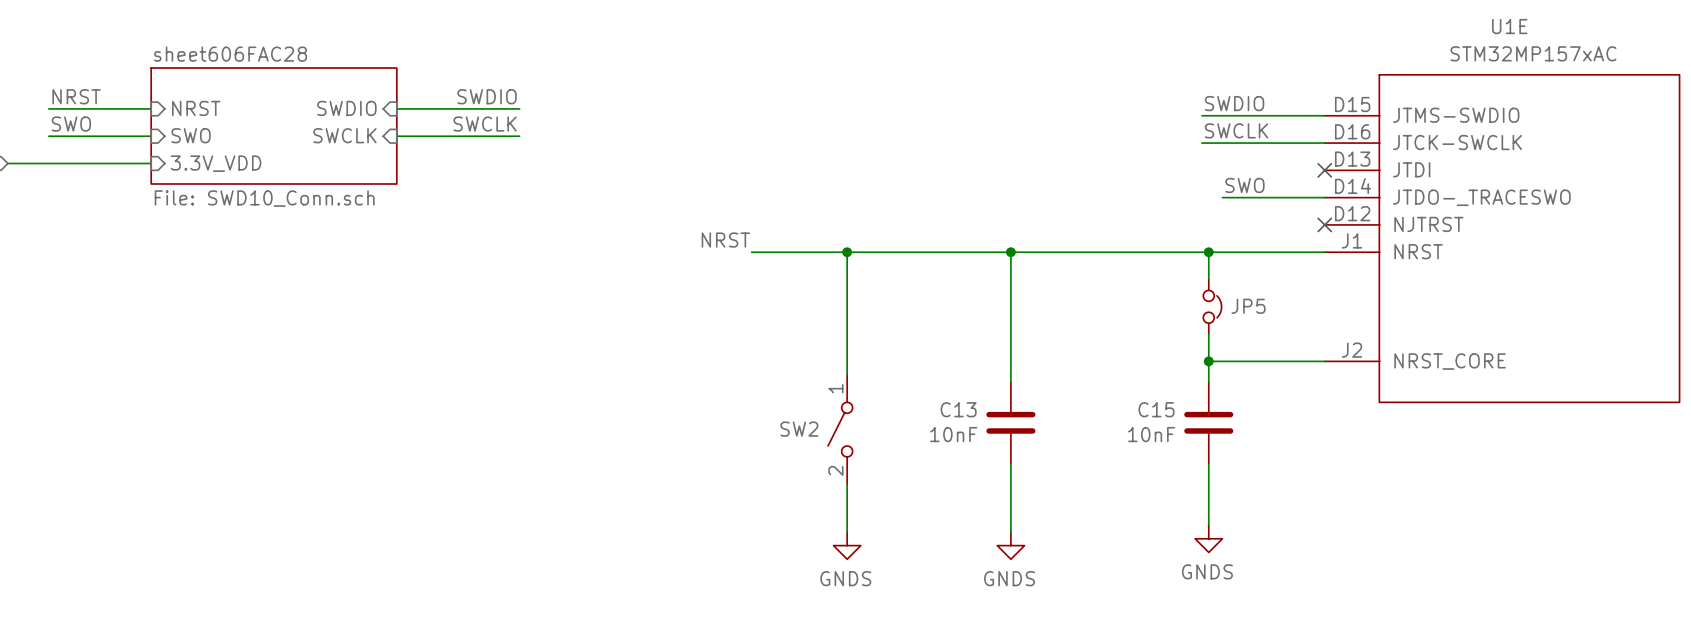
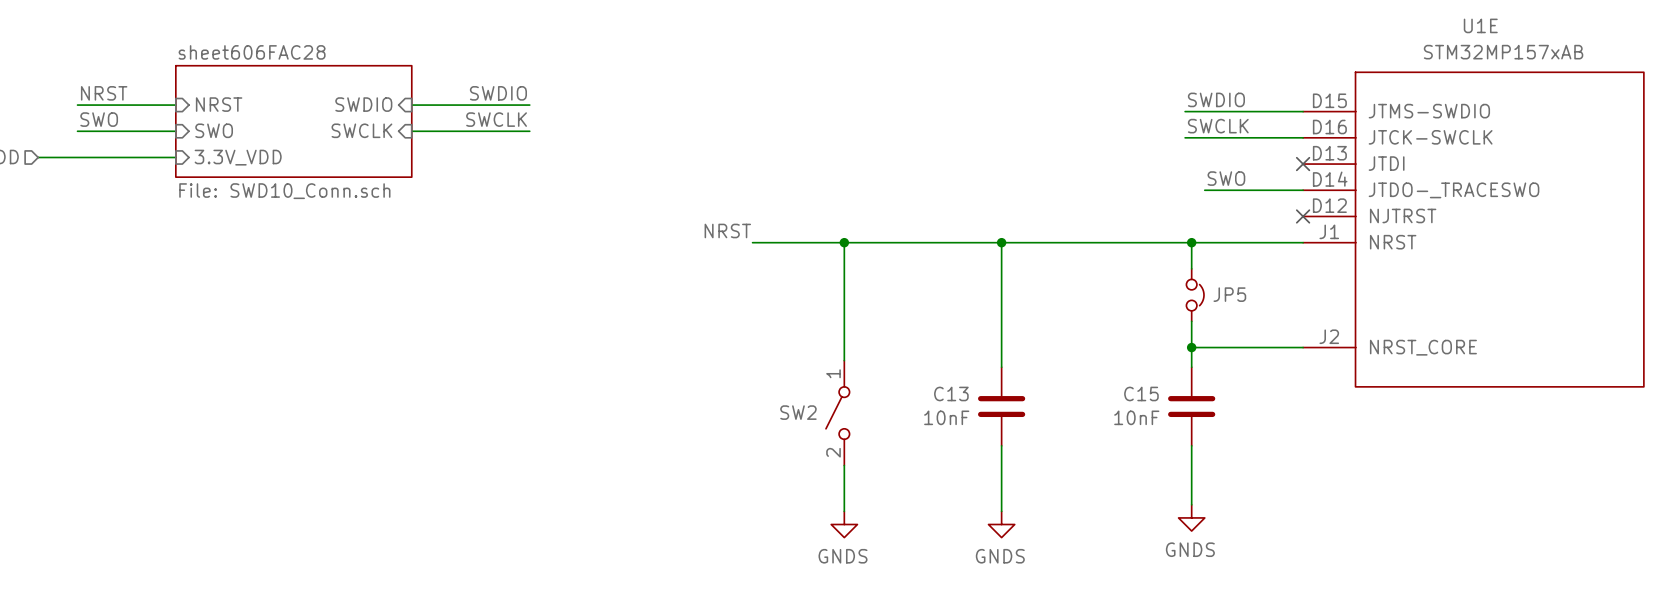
U1E value: STM32MP157xAC (1533, 53) -> STM32MP157xAB (1503, 52)

